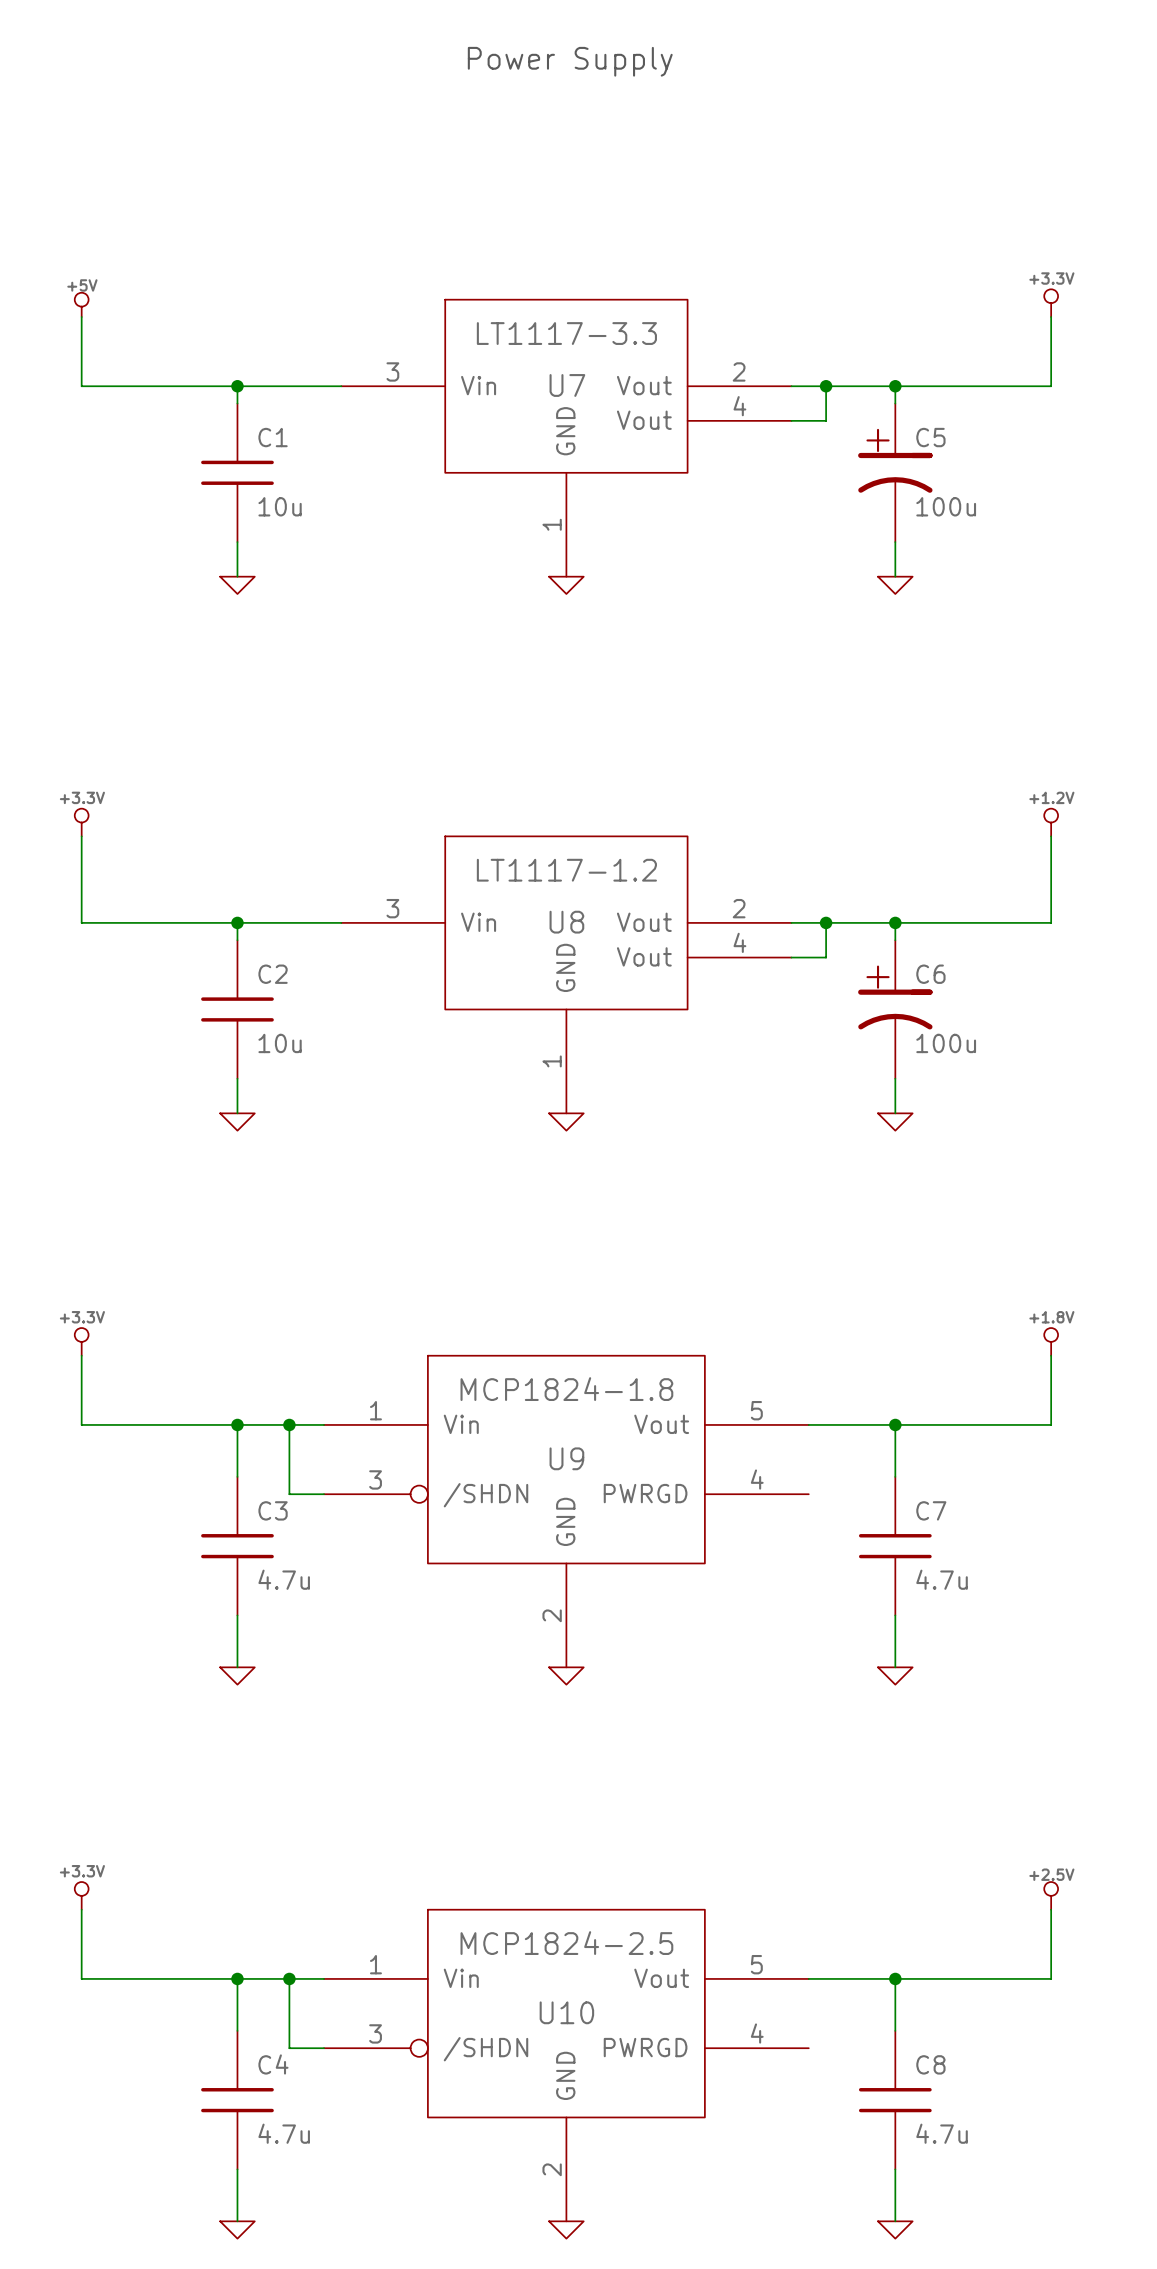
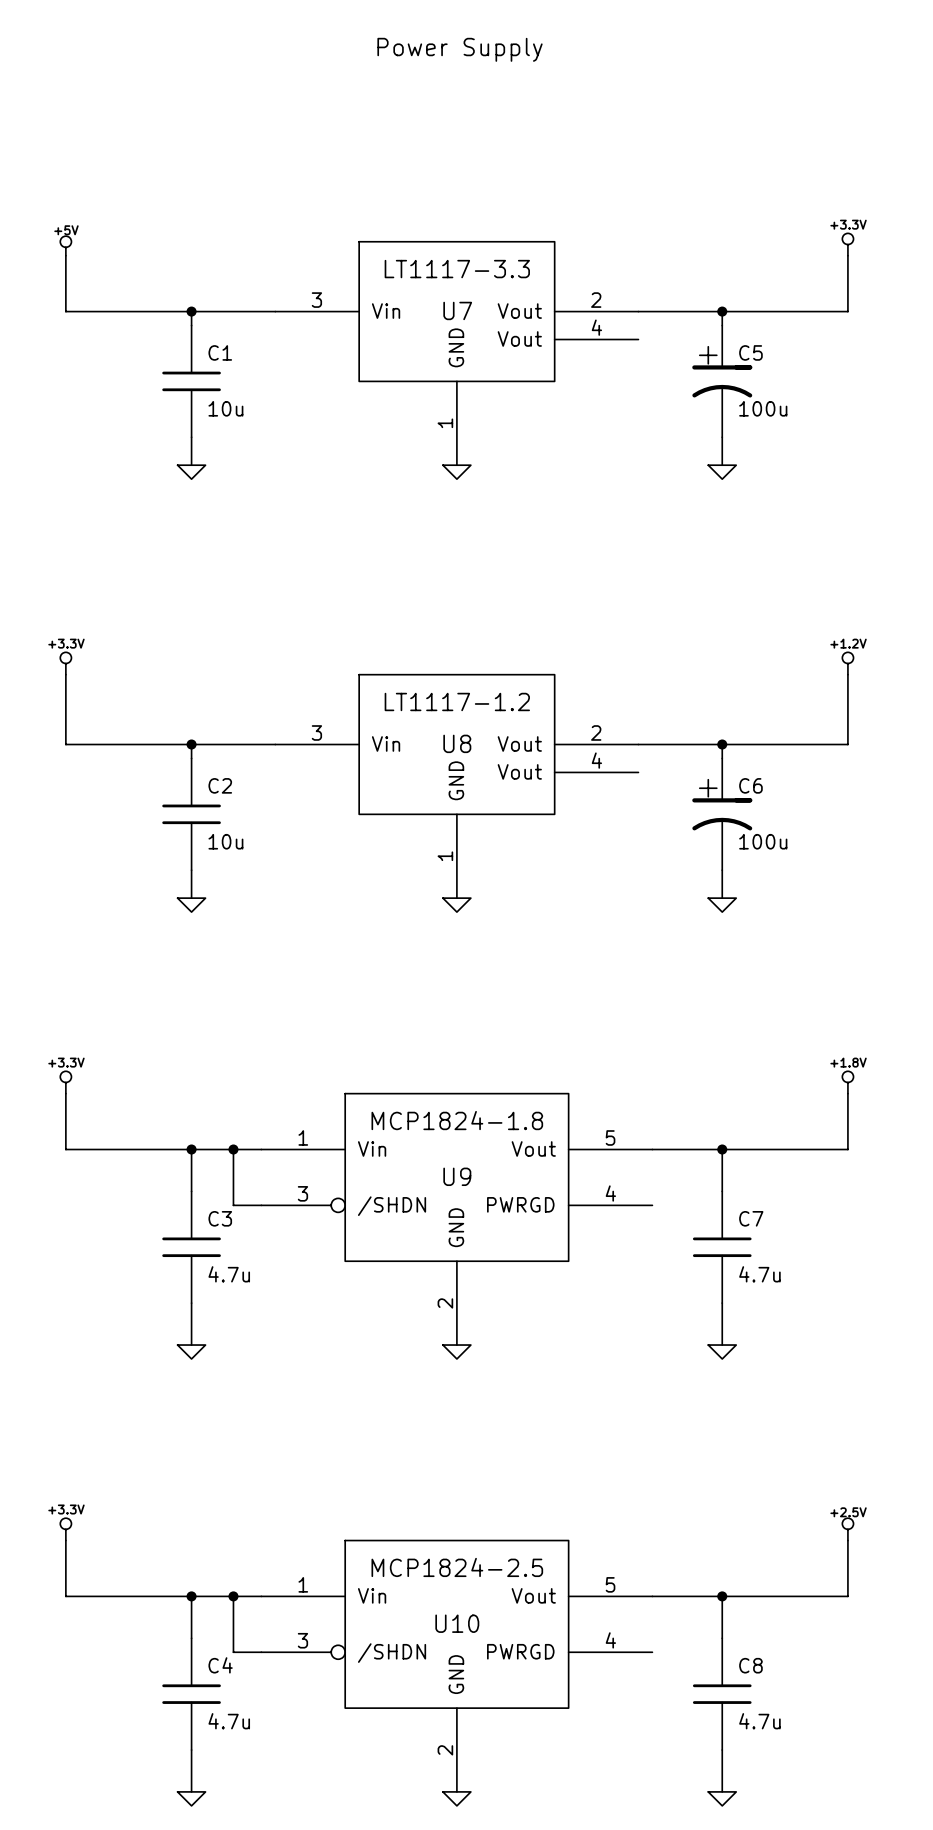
wire: (826, 386) (826, 420) (791, 420) -> none
junction: (826, 386) -> none
wire: (826, 922) (826, 957) (791, 957) -> none
junction: (826, 922) -> none

